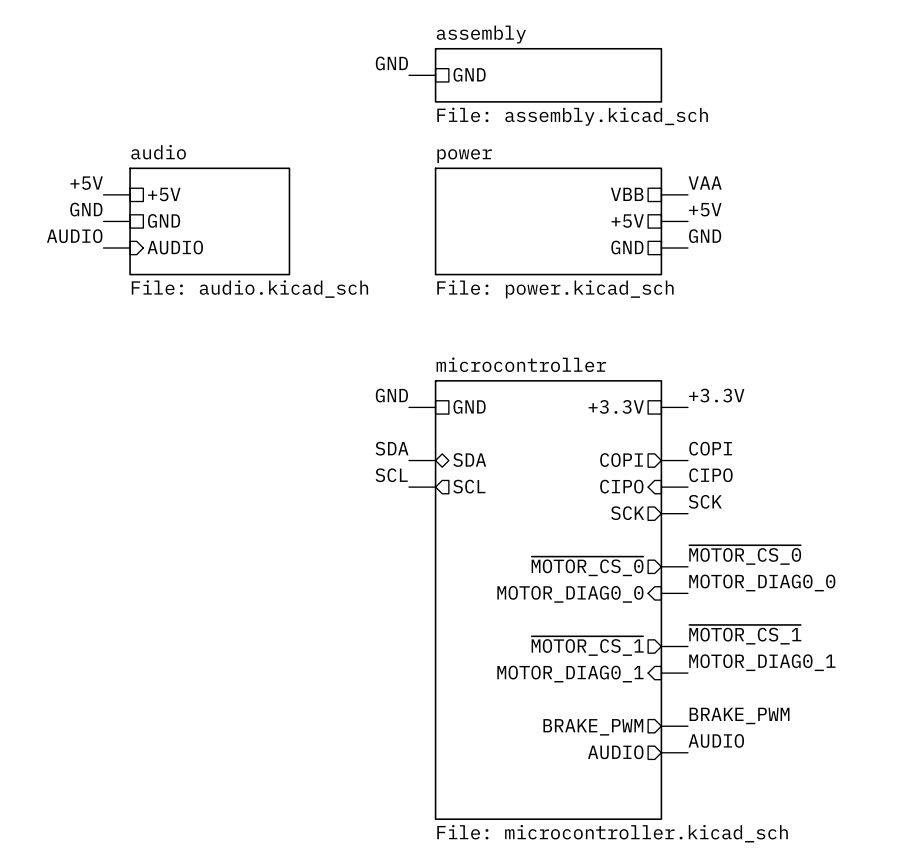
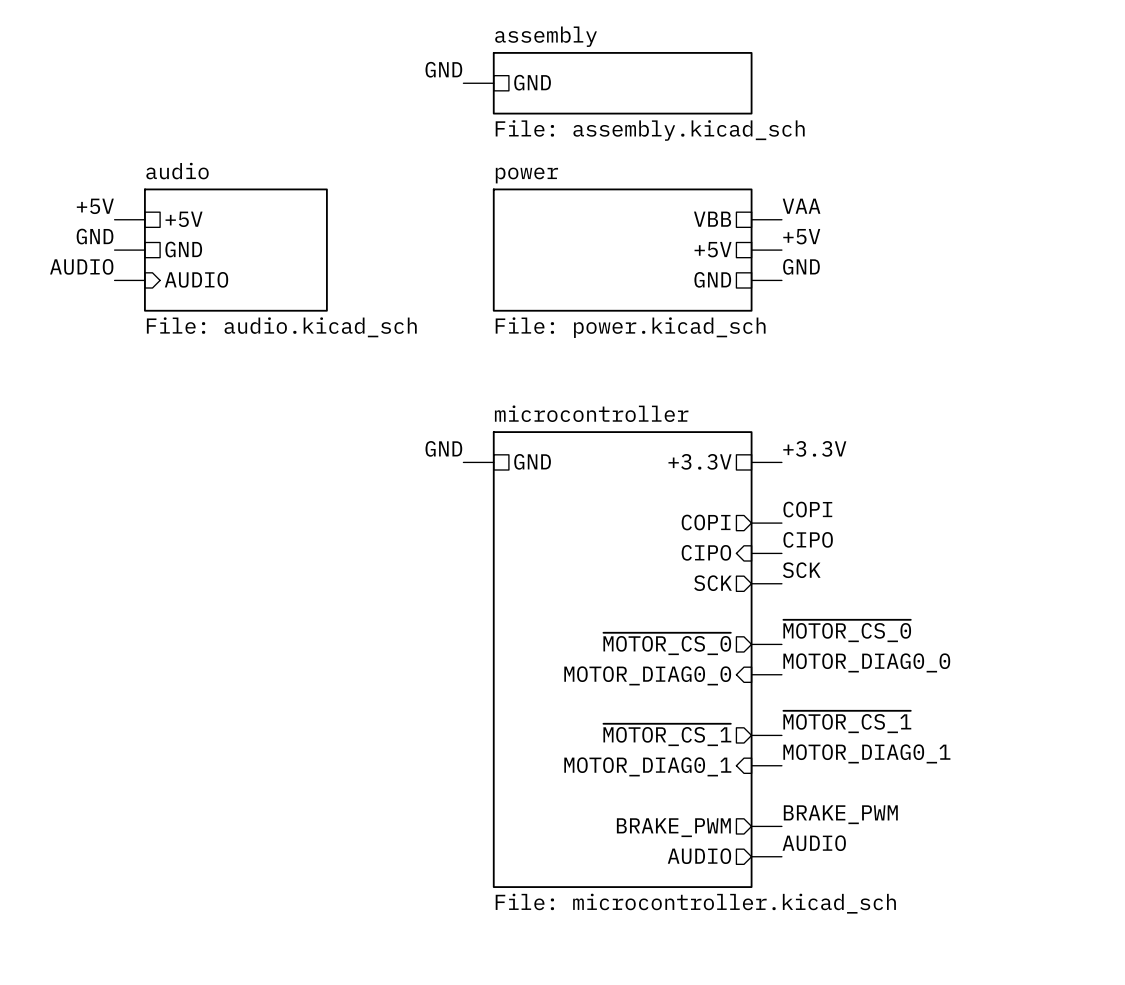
label: SDA (392, 448) -> none
wire: (409, 460) (435, 460) -> none
sheet pin: SDA (469, 460) -> none
label: SCL (391, 475) -> none
sheet pin: SCL (469, 486) -> none
wire: (409, 487) (435, 487) -> none
sheet microcontroller: none -> File: microcontroller.kicad_sch (622, 659)
sheet microcontroller: File: microcontroller.kicad_sch (548, 600) -> none

